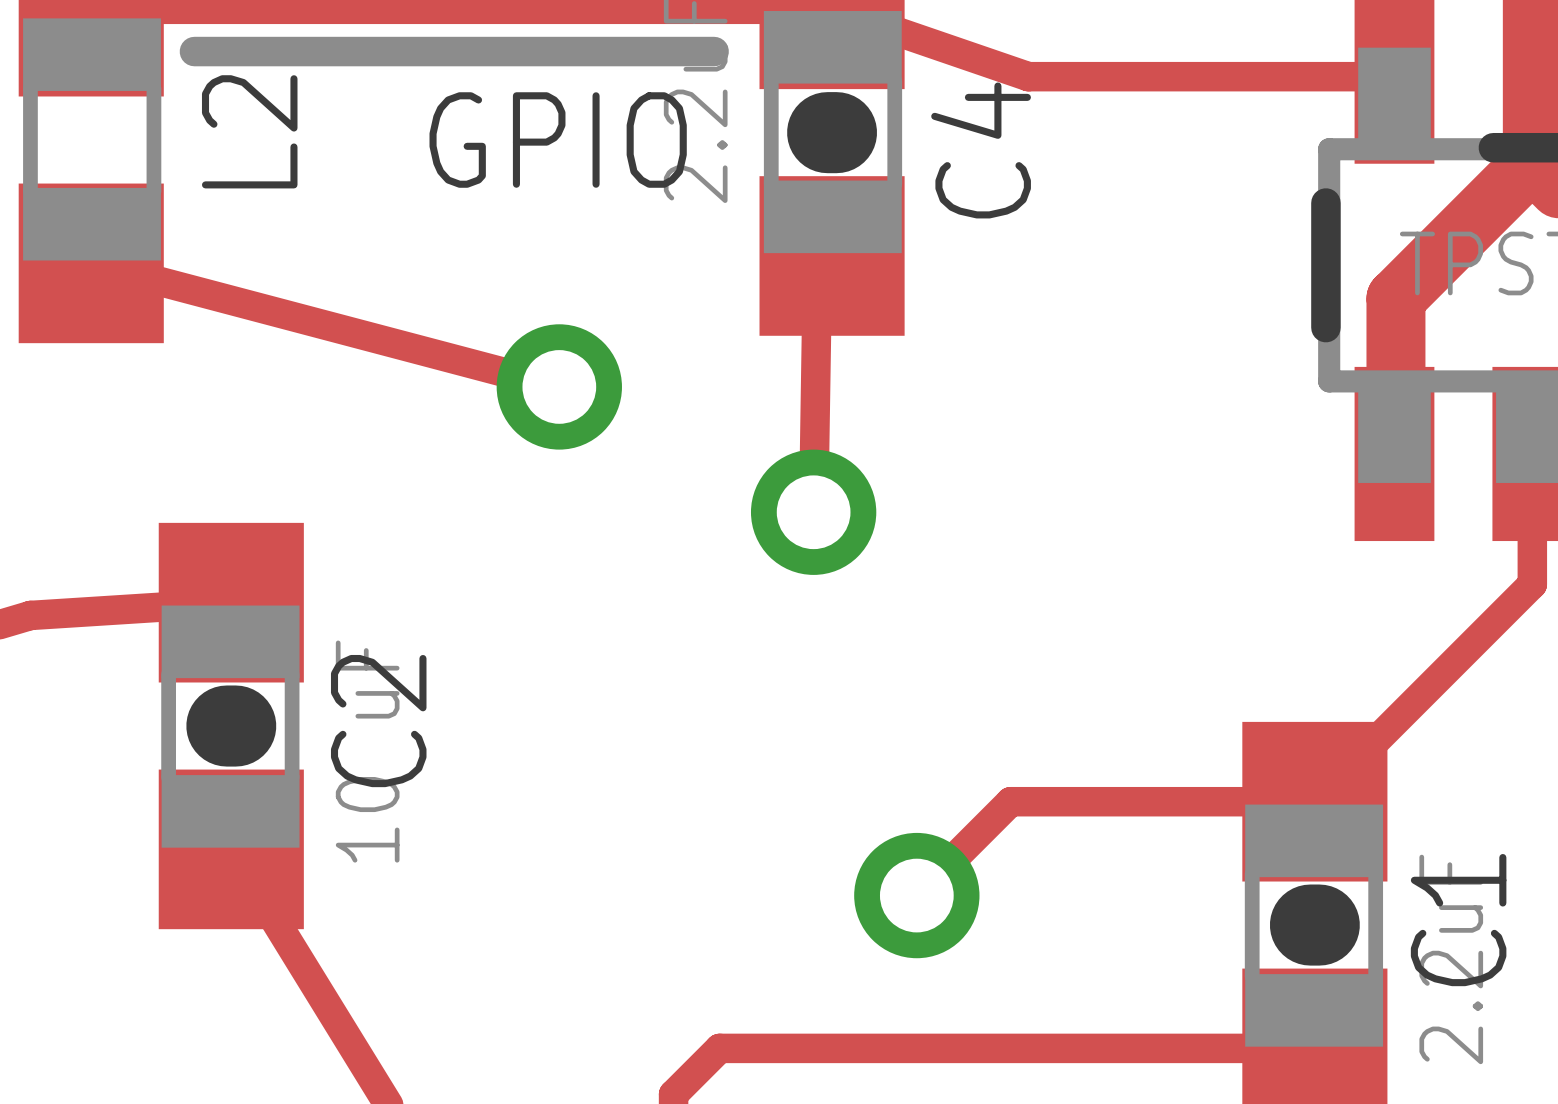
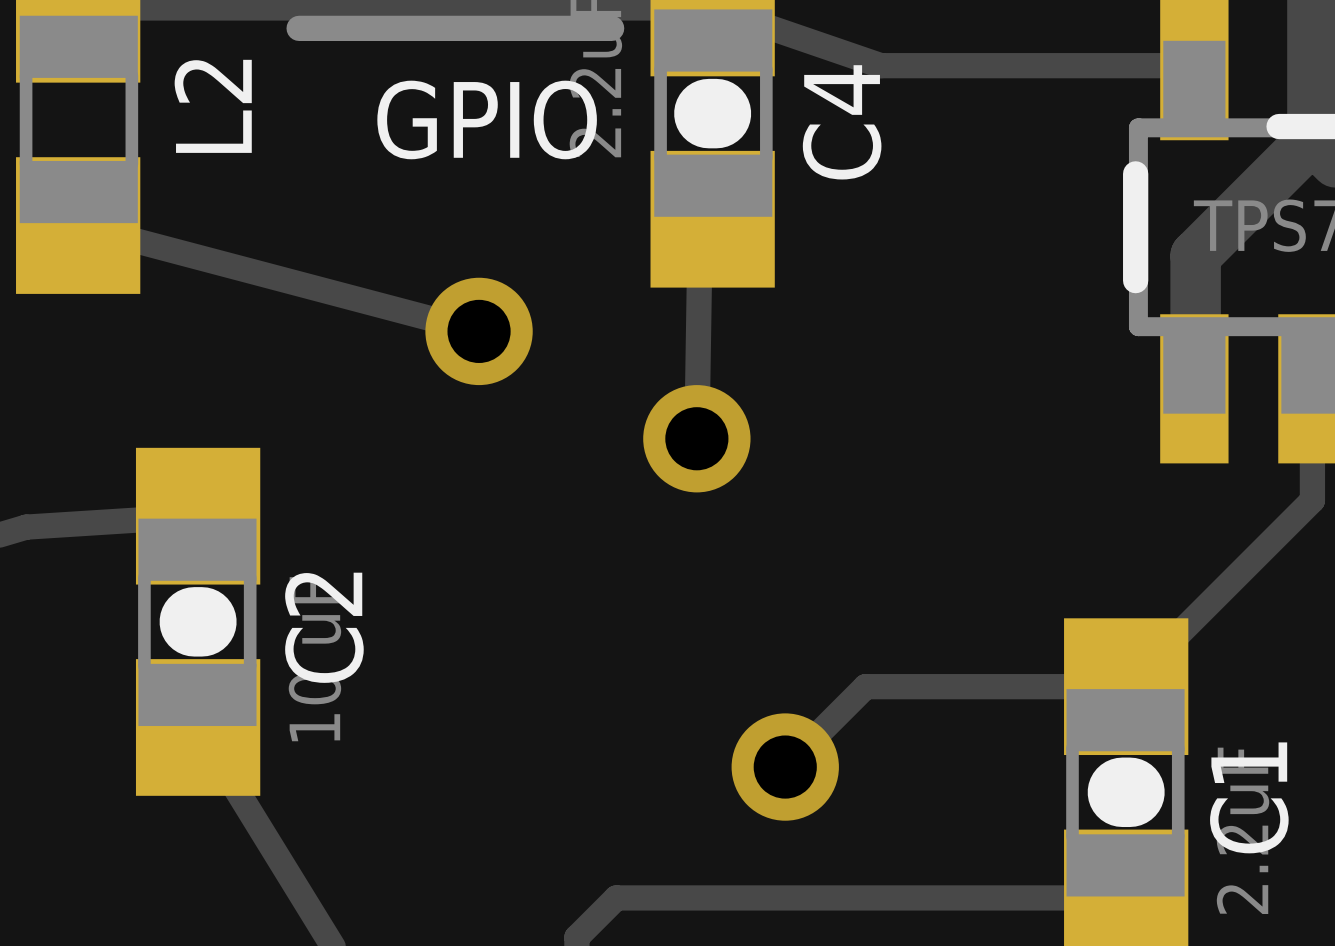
line: none -> (299, 28) (611, 28)
line: (194, 51) (714, 51) -> none

